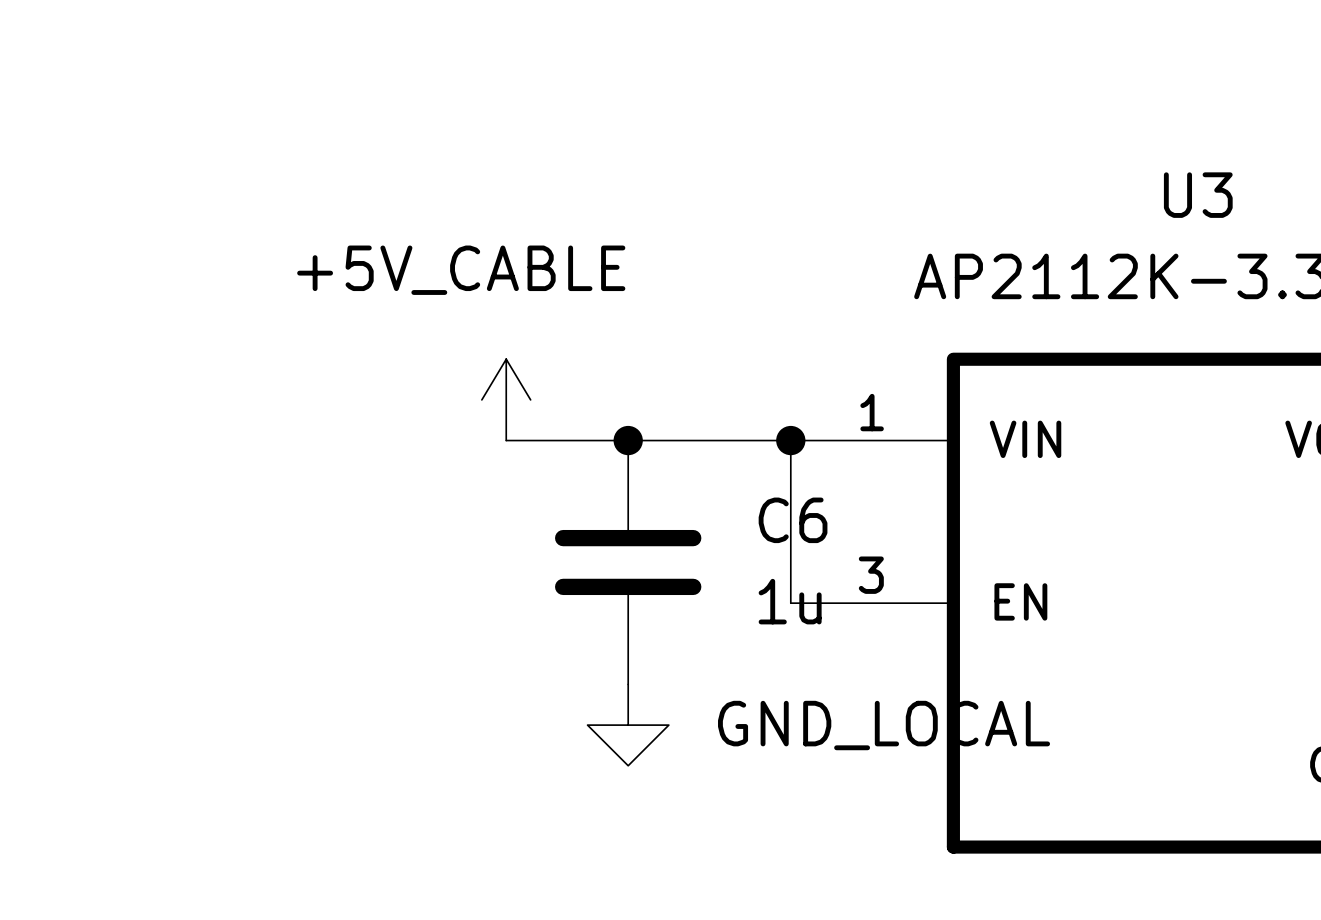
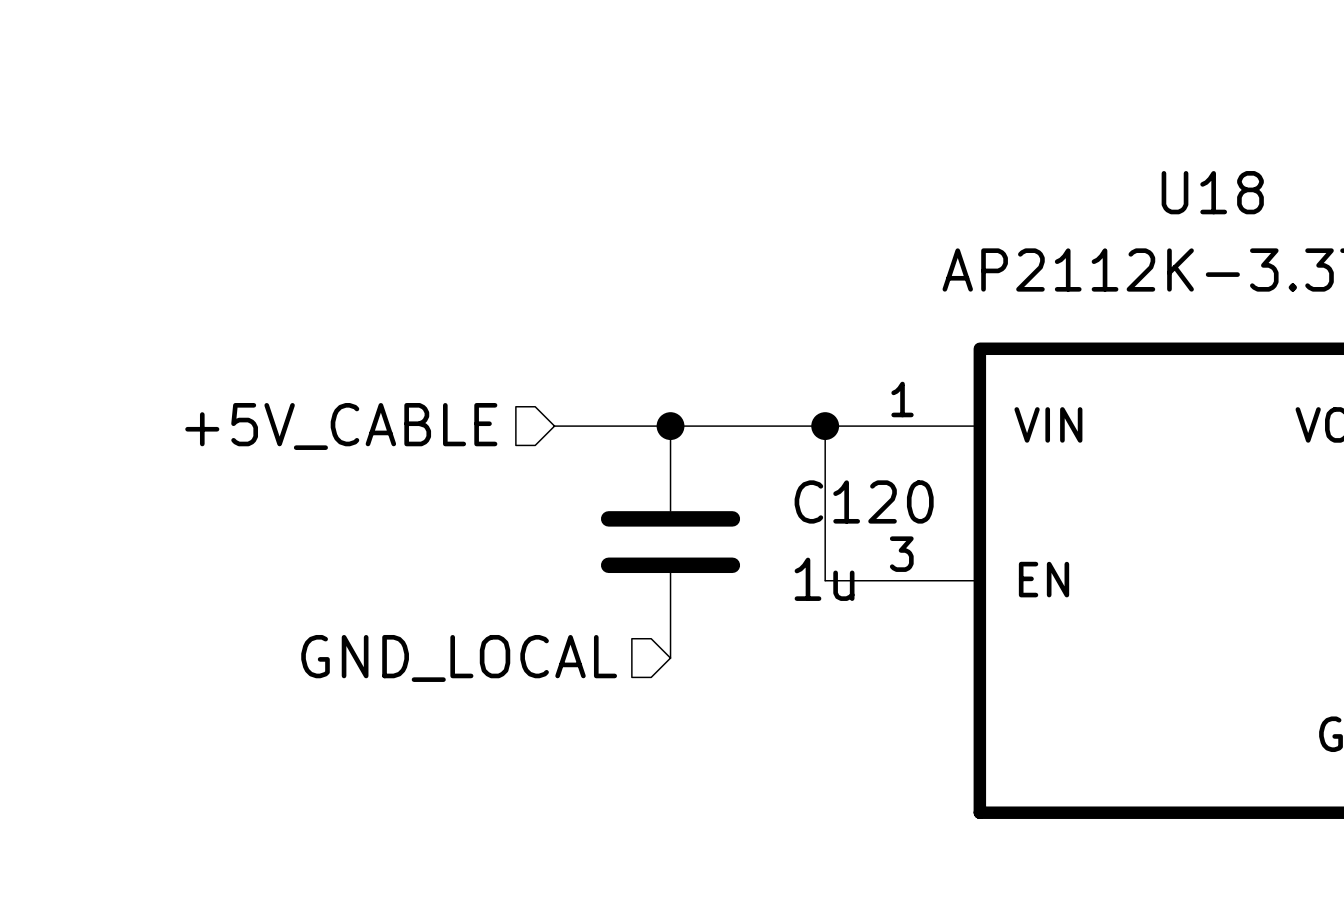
U3 name: U3 (1198, 195) -> U18 (1212, 192)
power symbol: +5V_CABLE (506, 399) -> none
hierarchical label: none -> +5V_CABLE (341, 426)
C6 name: C6 (793, 520) -> C120 (864, 501)
hierarchical label: none -> GND_LOCAL (459, 658)
power symbol: GND_LOCAL (628, 725) -> none

